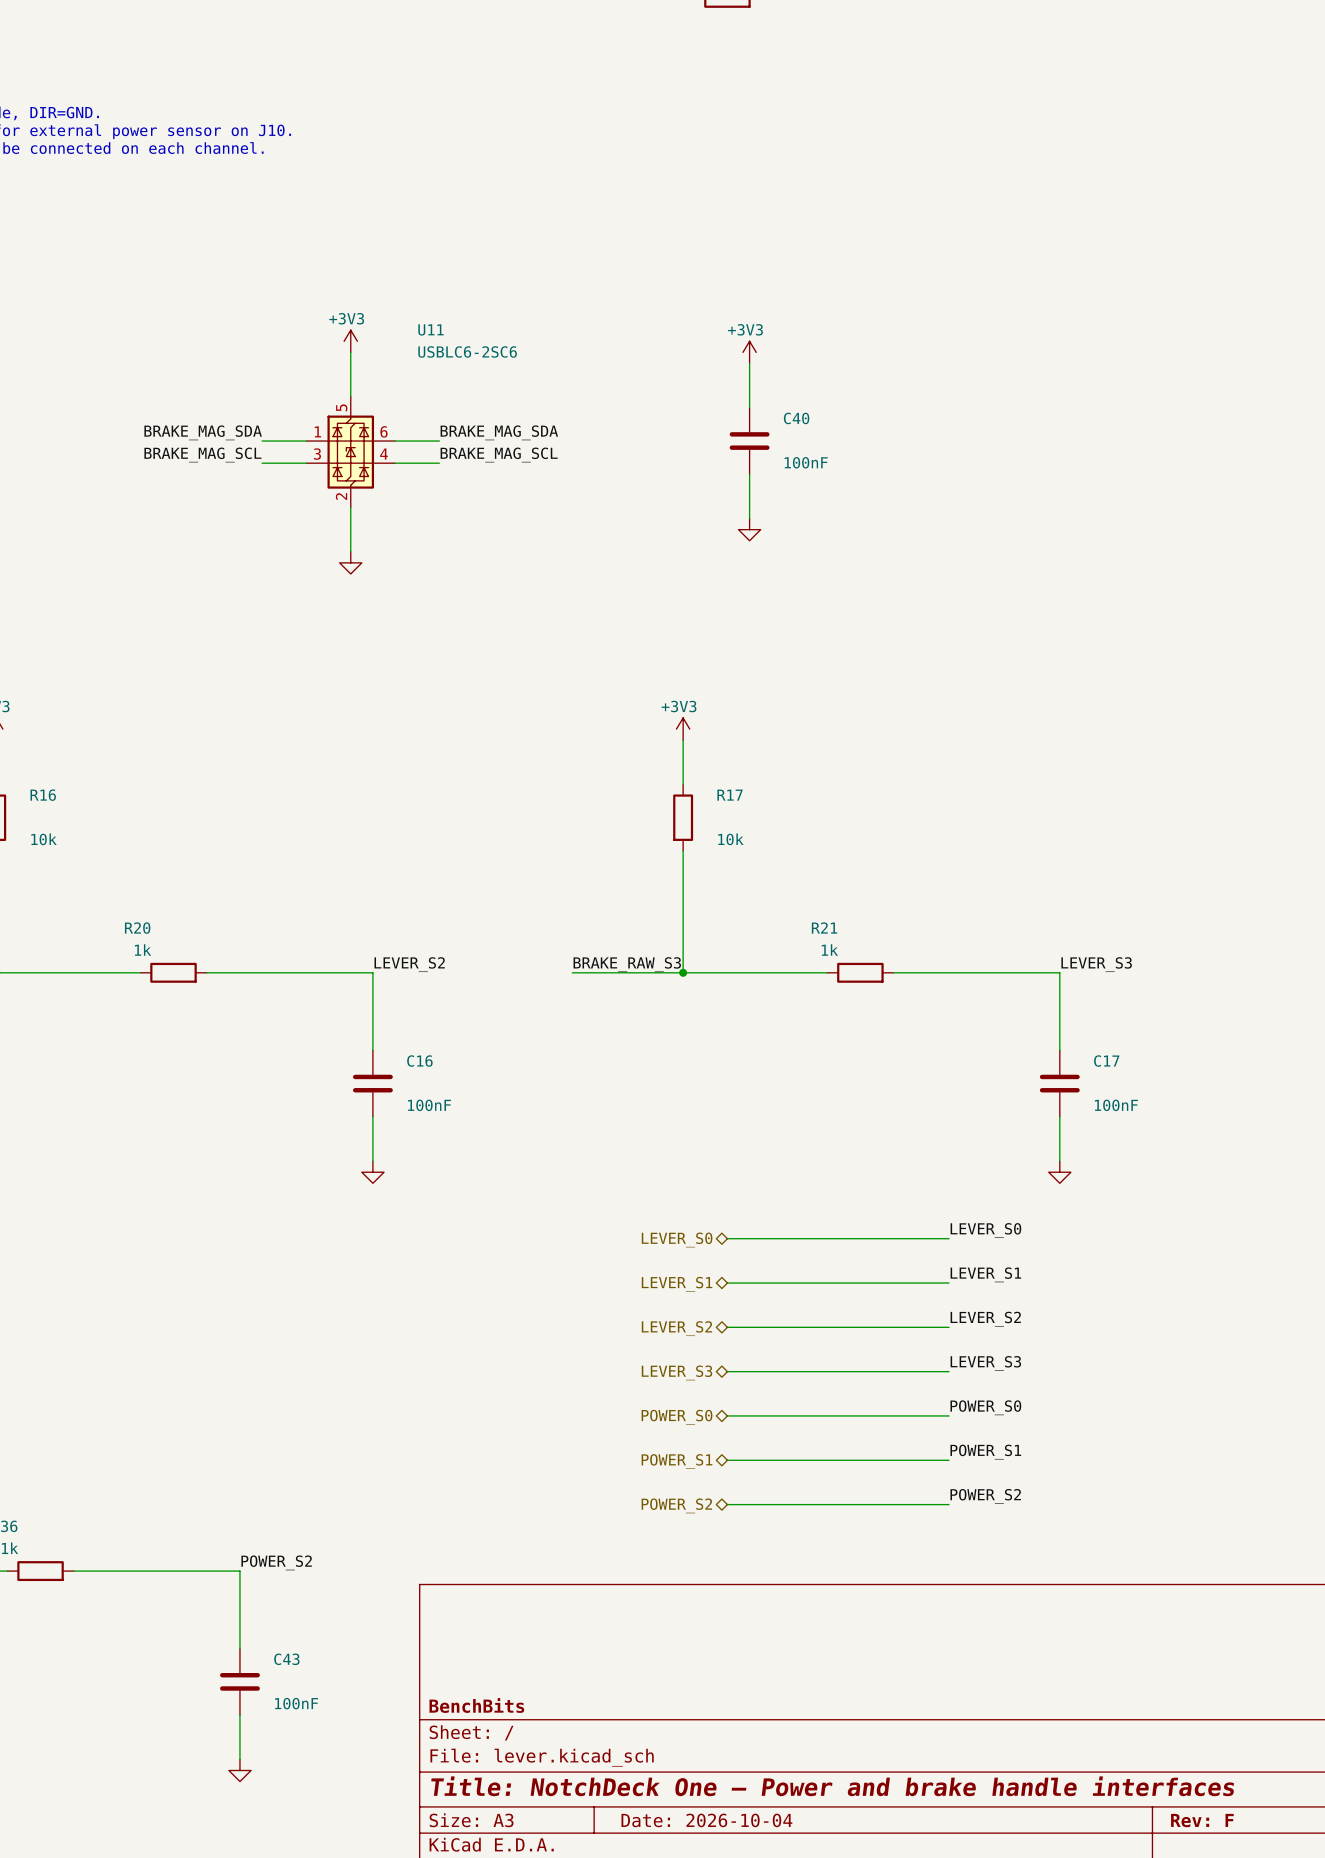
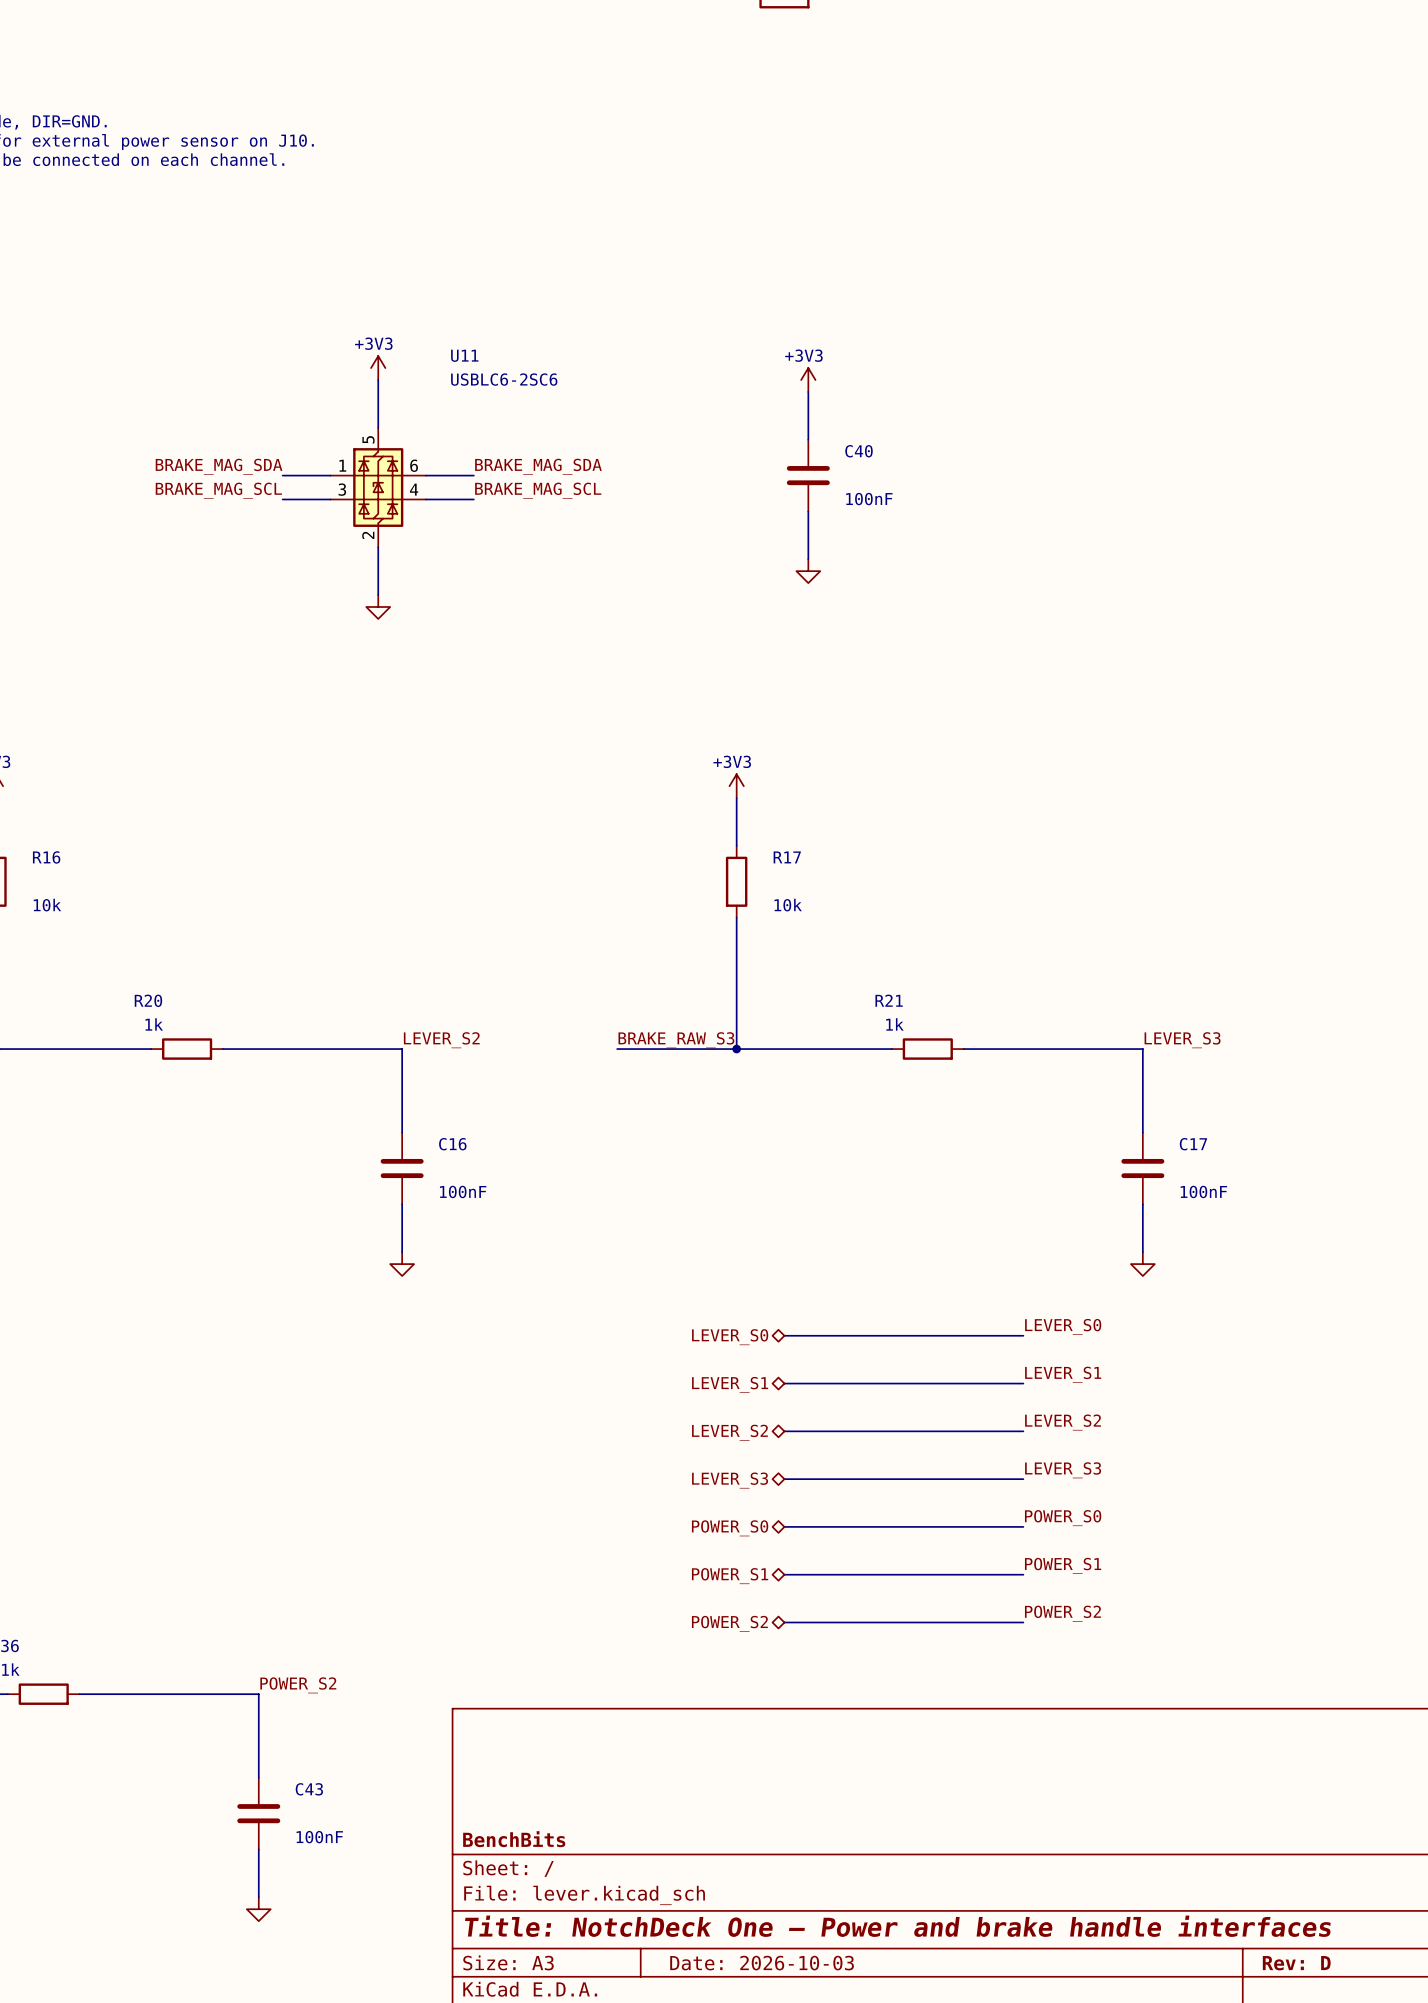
title block: Date: 2026-10-04 (706, 1820) -> Date: 2026-10-03 (762, 1963)
title block: Rev: F (1202, 1820) -> Rev: D (1296, 1963)

